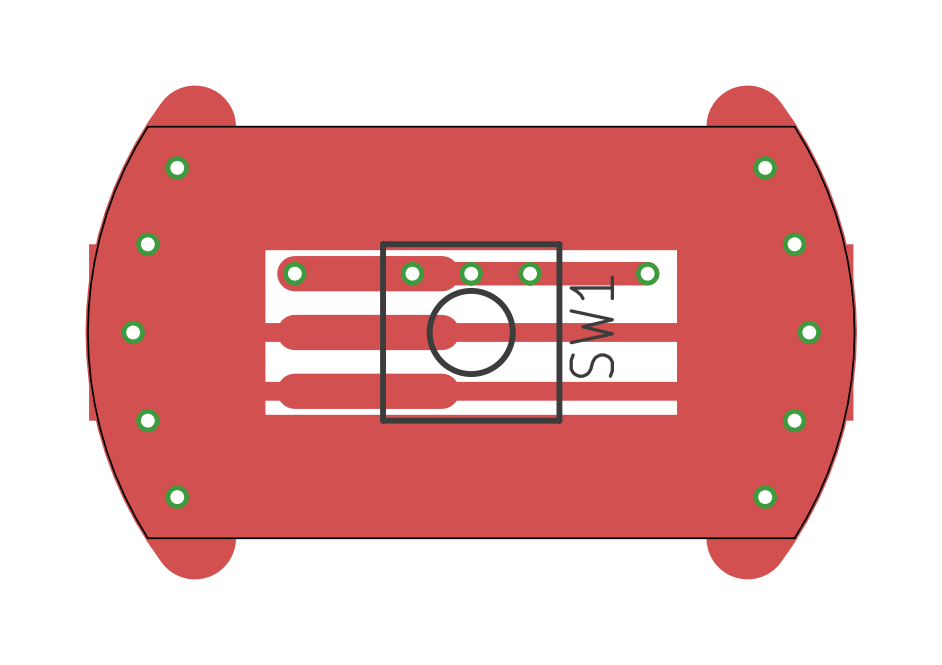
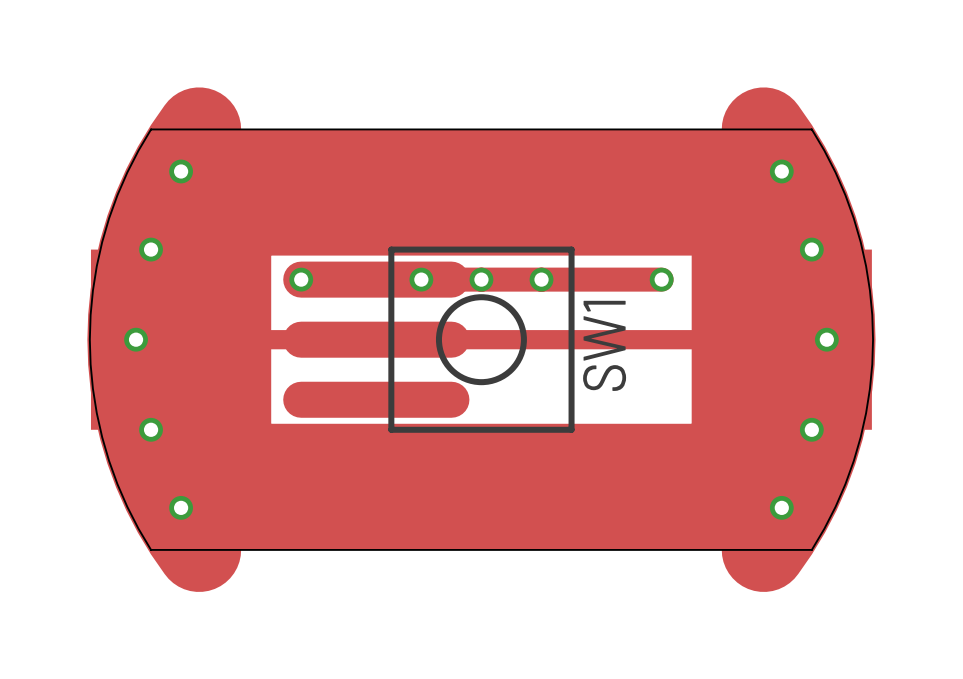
track: (236, 391) (706, 391) -> none

